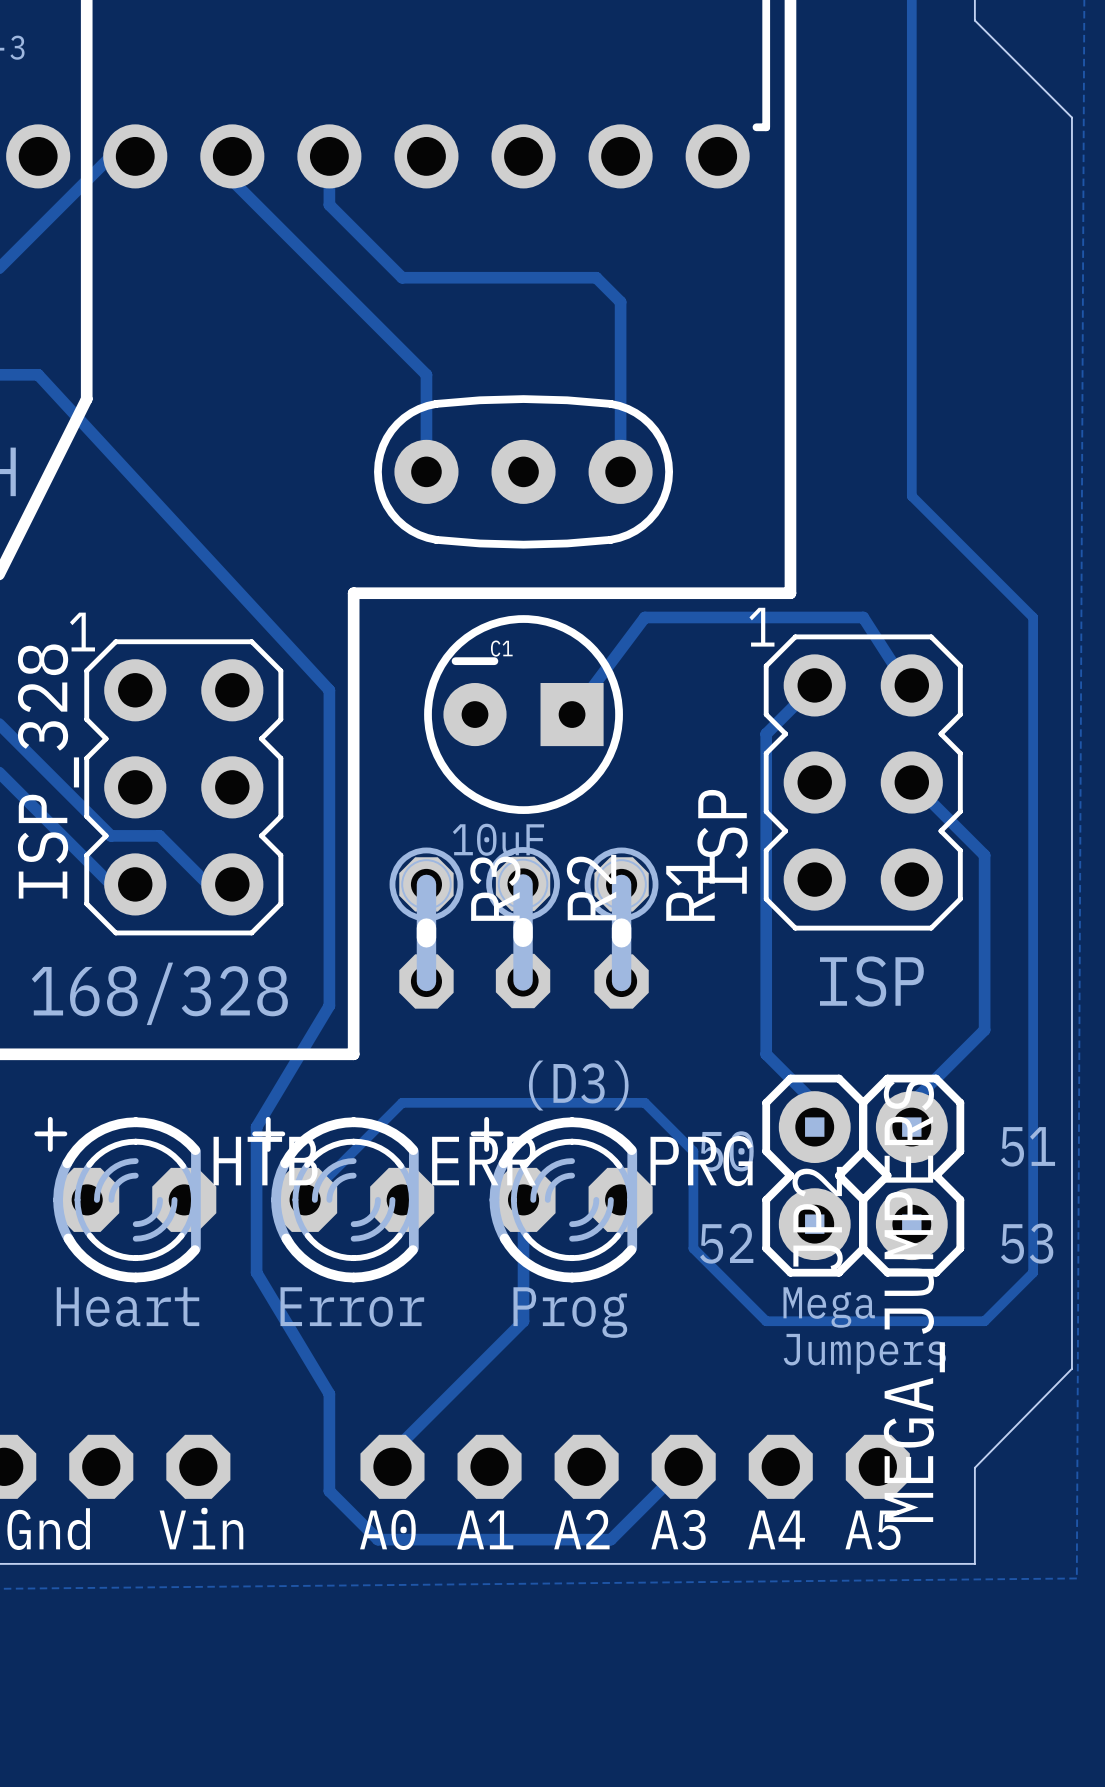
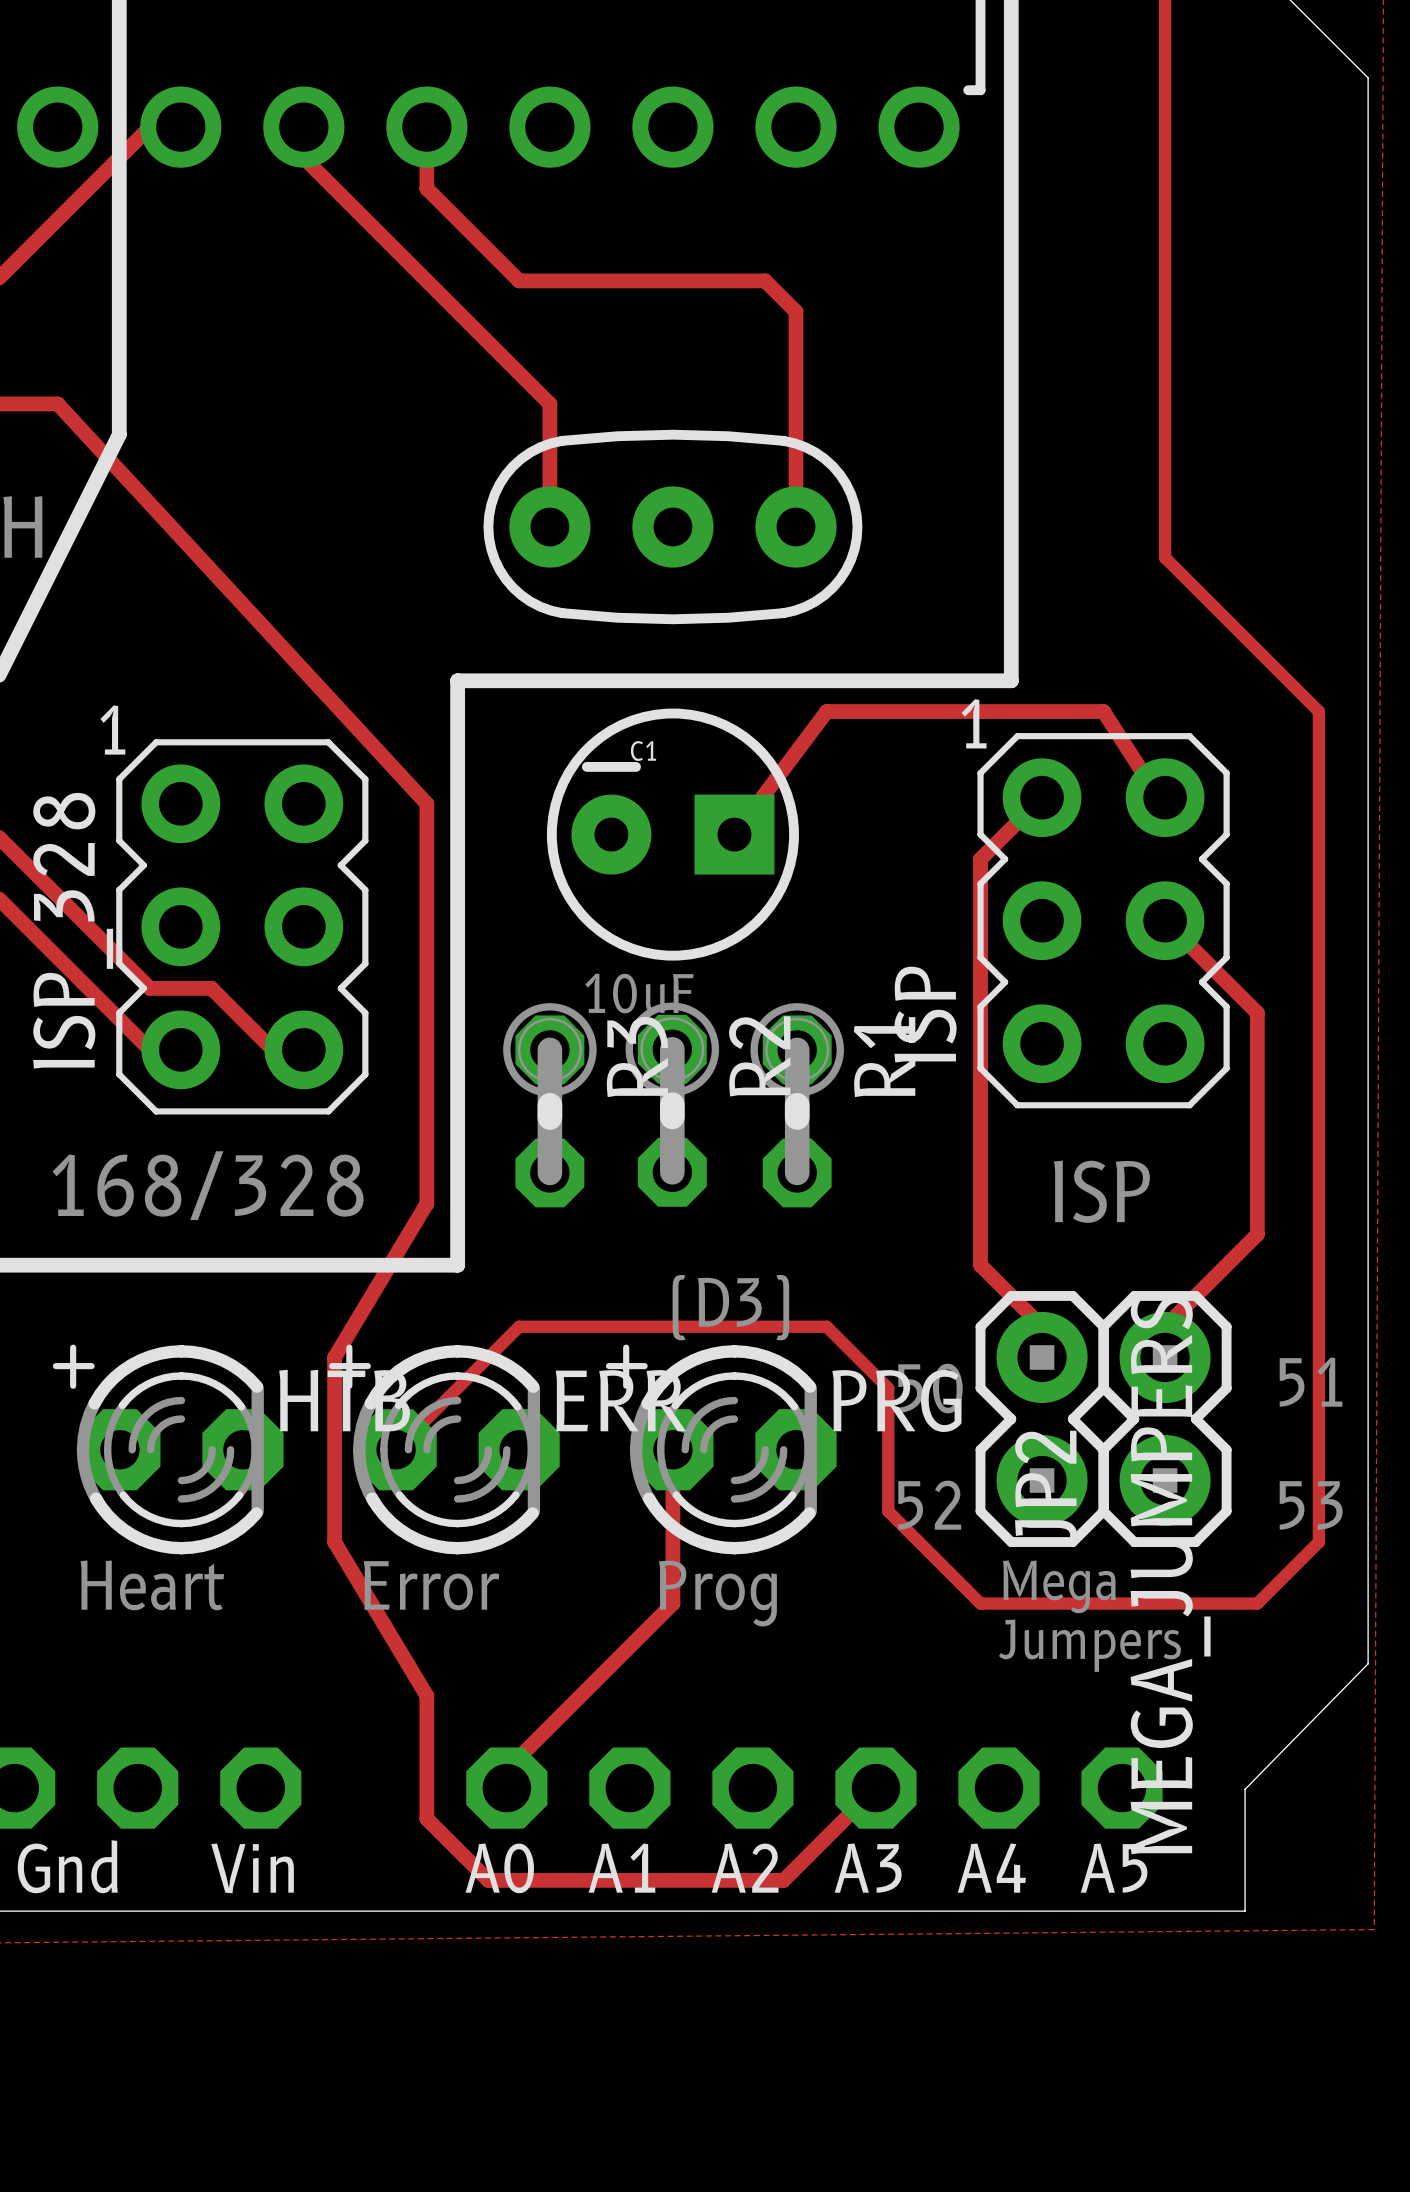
text position: ISP (871, 981) -> ISP (1101, 1191)

